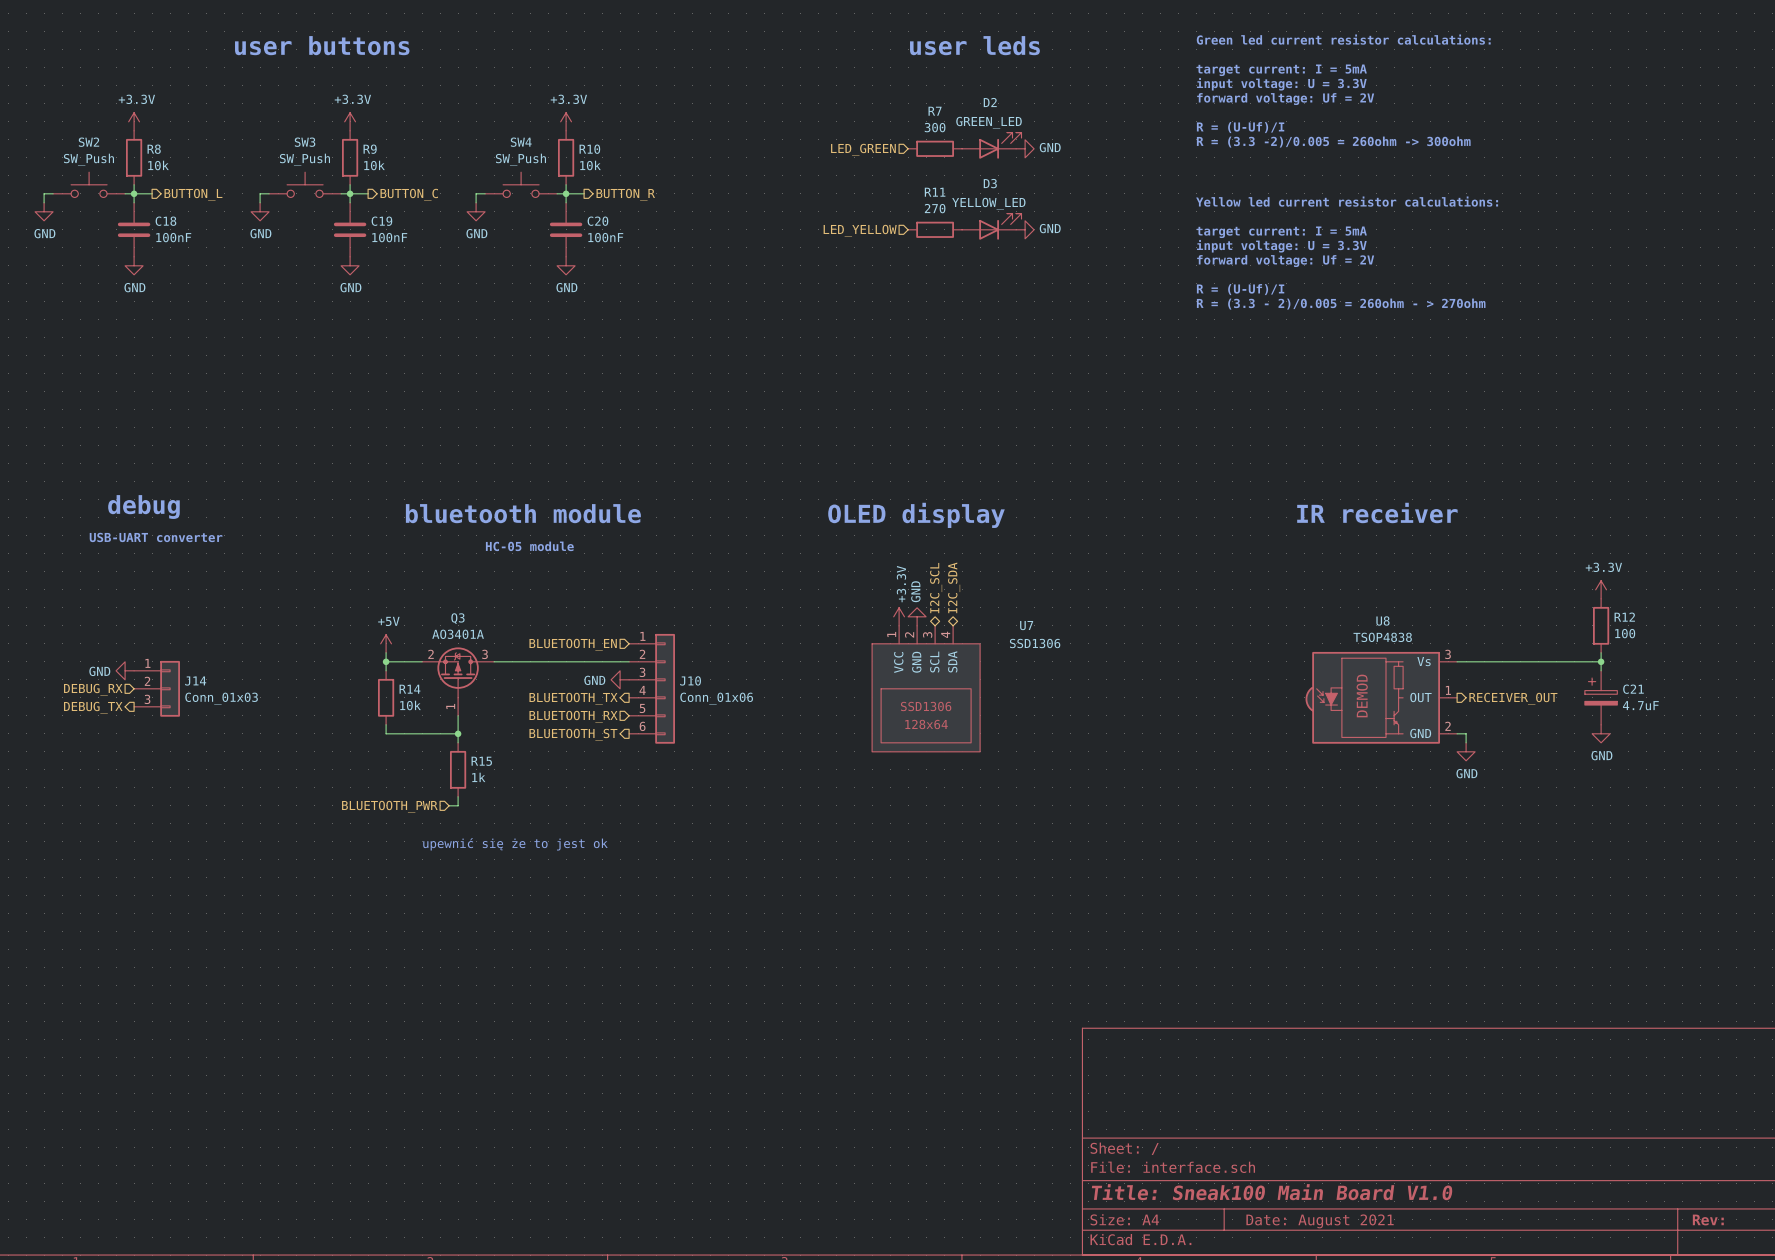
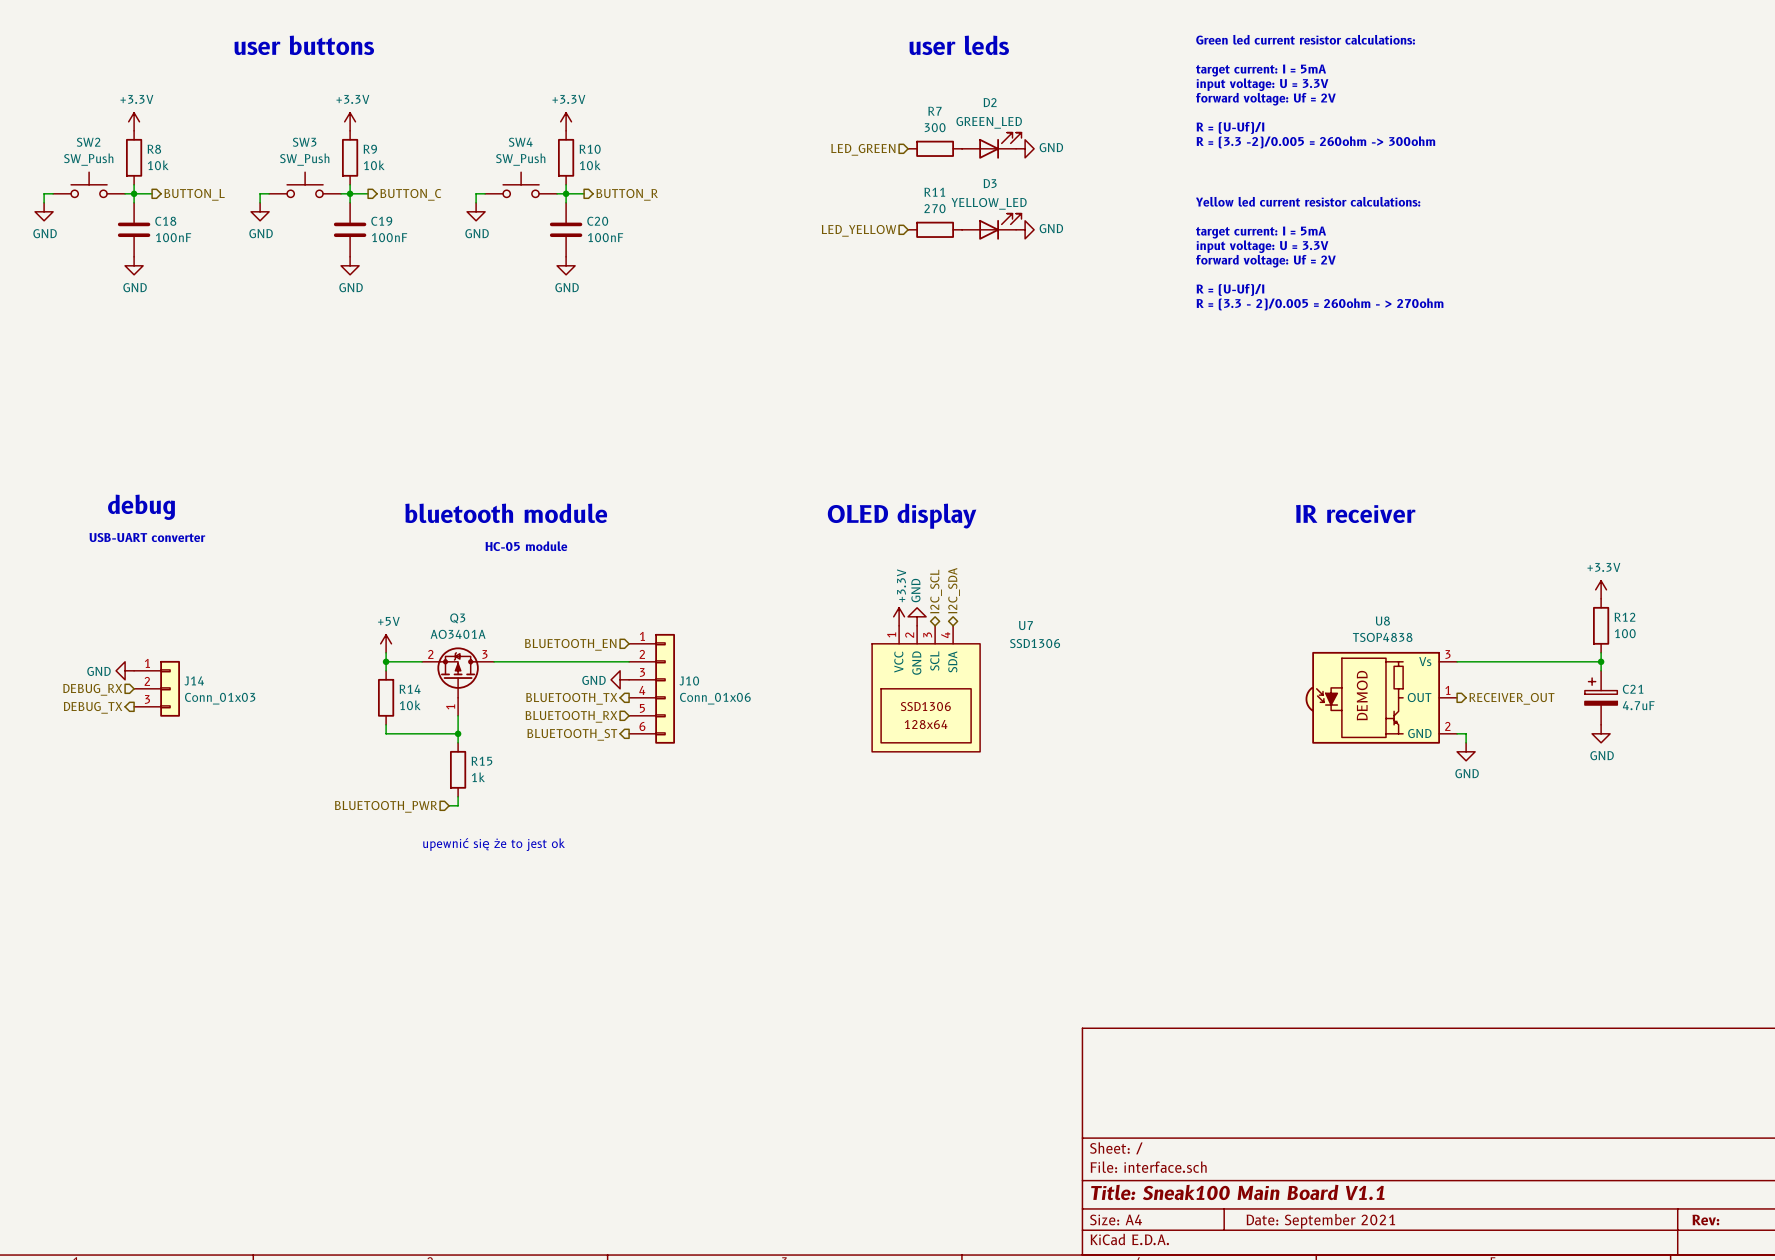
title block: Title: Sneak100 Main Board V1.0 (1272, 1192) -> Title: Sneak100 Main Board V1.1 (1237, 1192)
title block: Date: August 2021 (1320, 1221) -> Date: September 2021 (1320, 1221)

